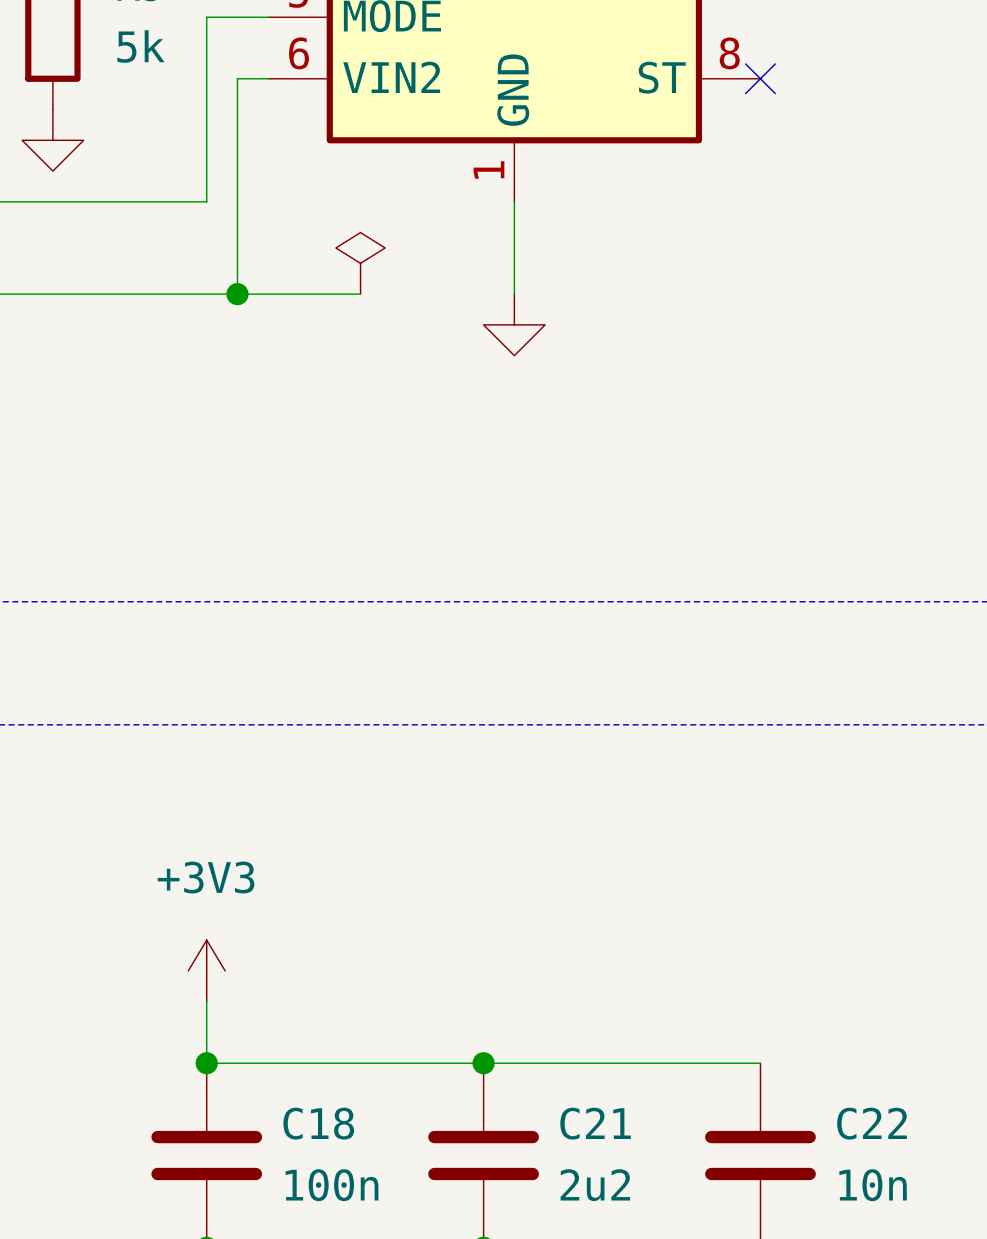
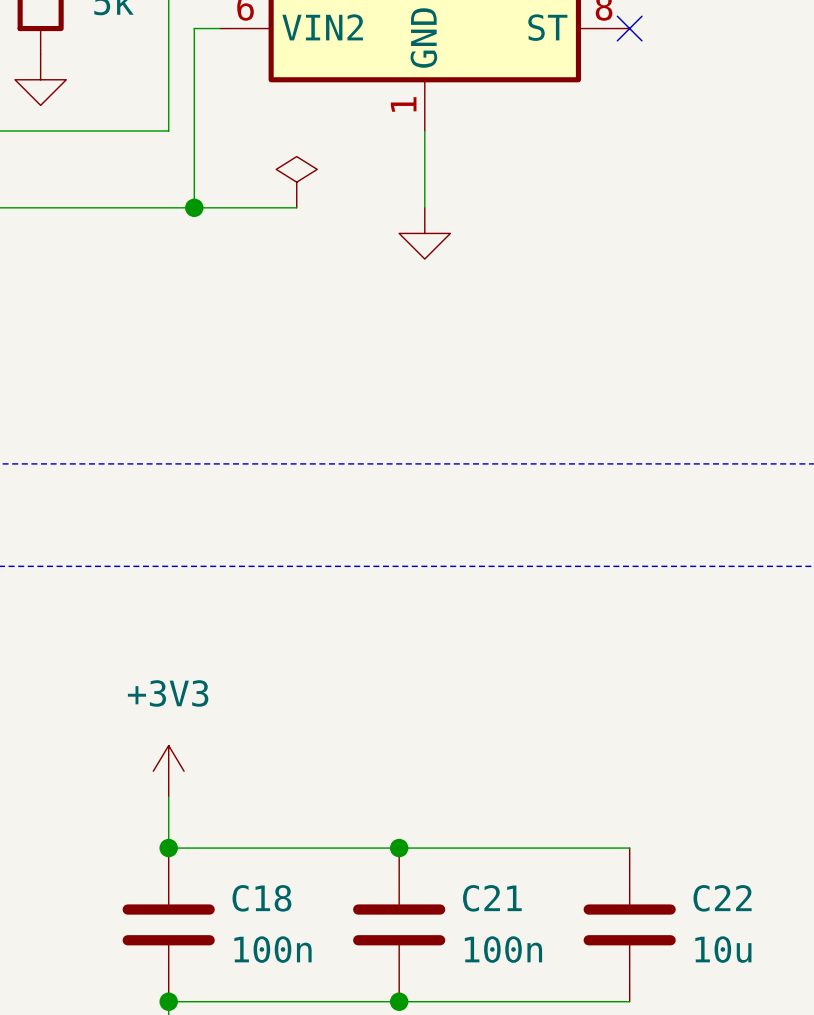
C21 value: 2u2 (595, 1185) -> 100n (503, 949)
C22 value: 10n (873, 1185) -> 10u (723, 949)

